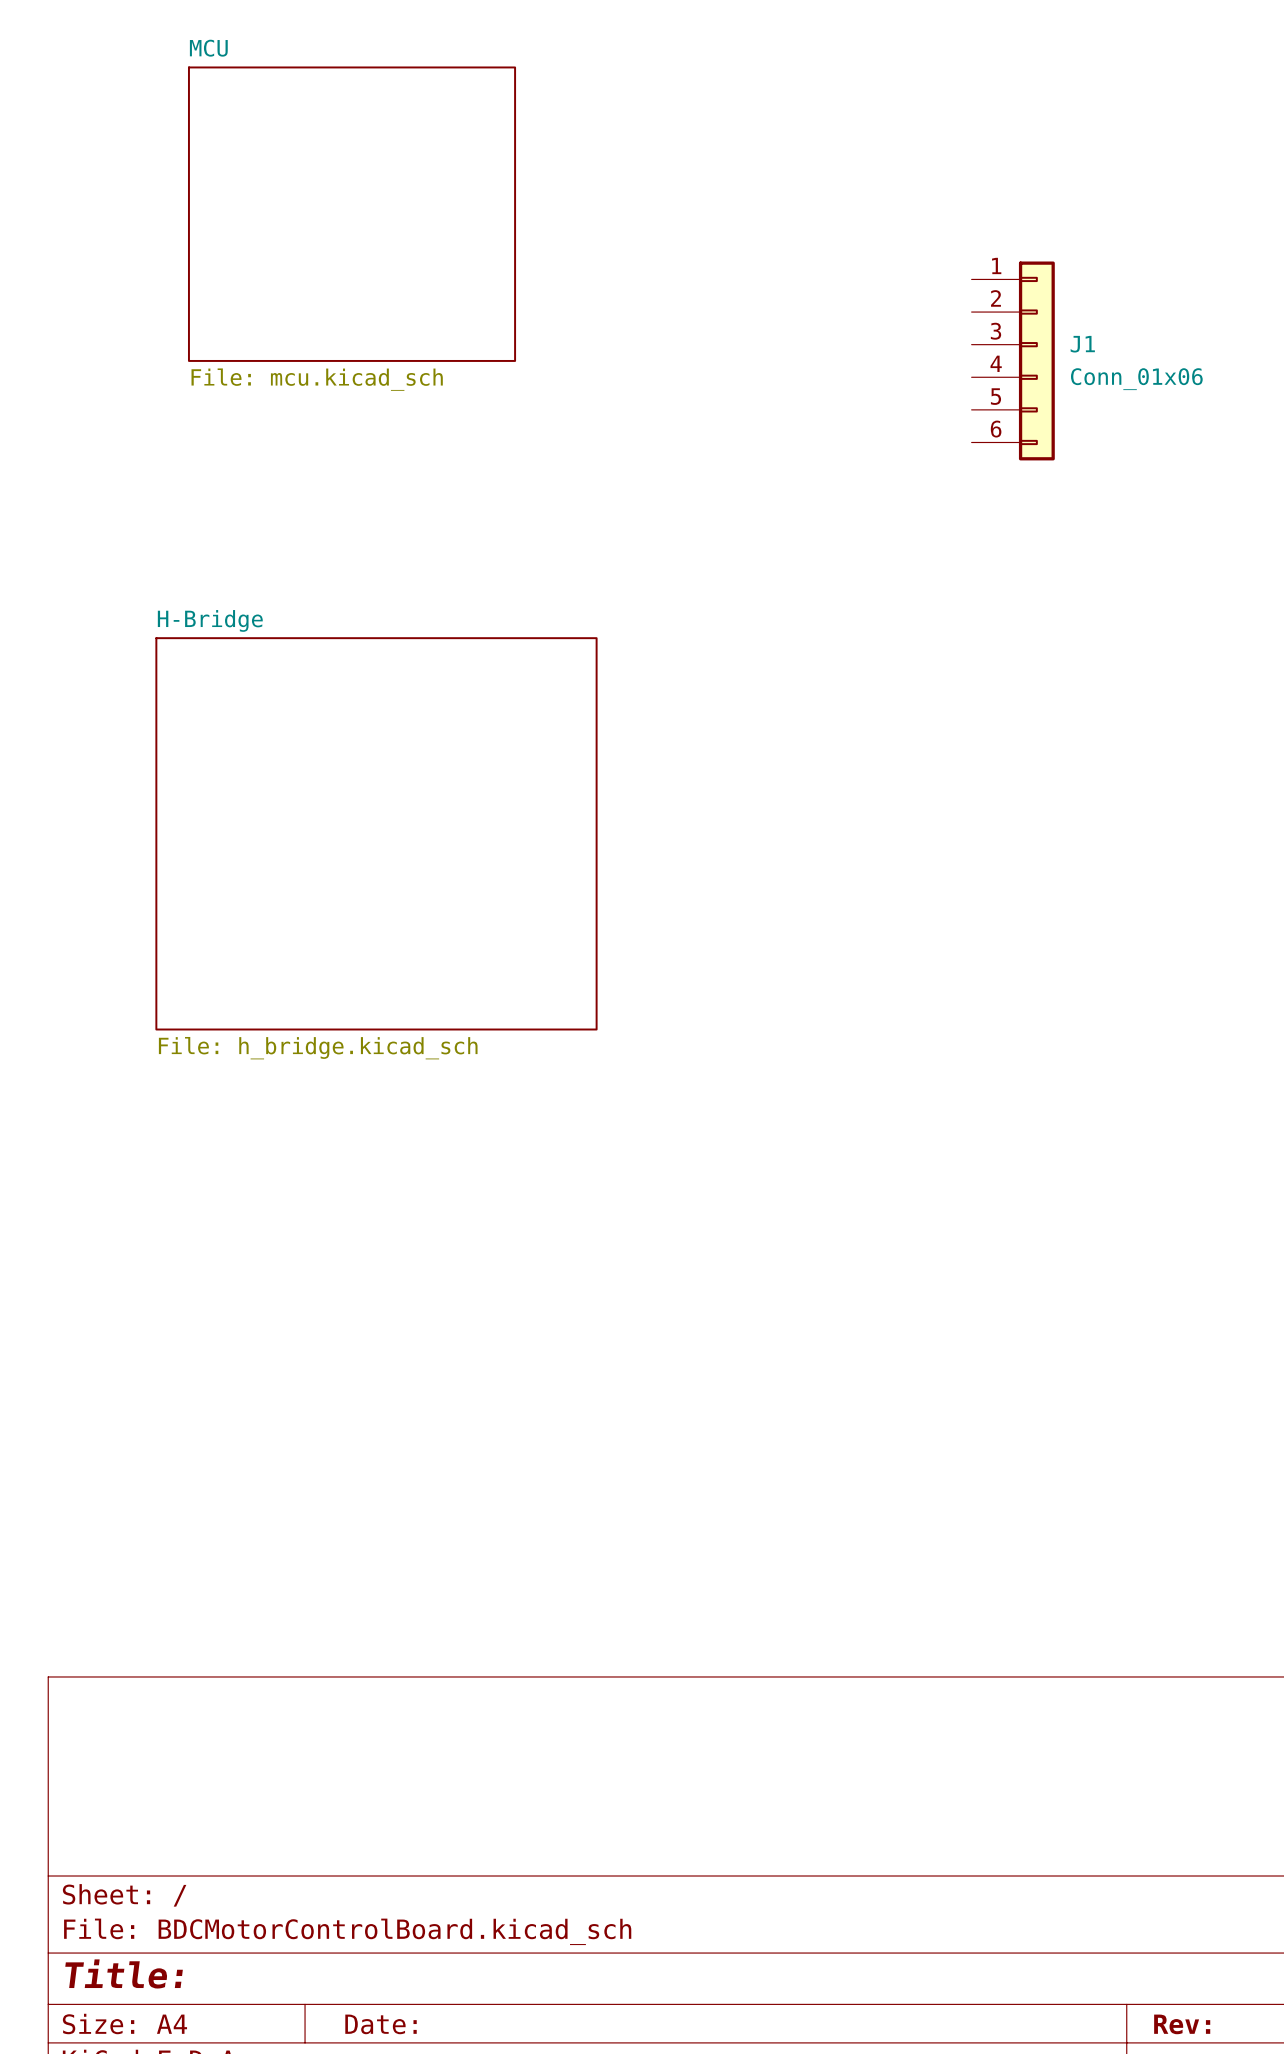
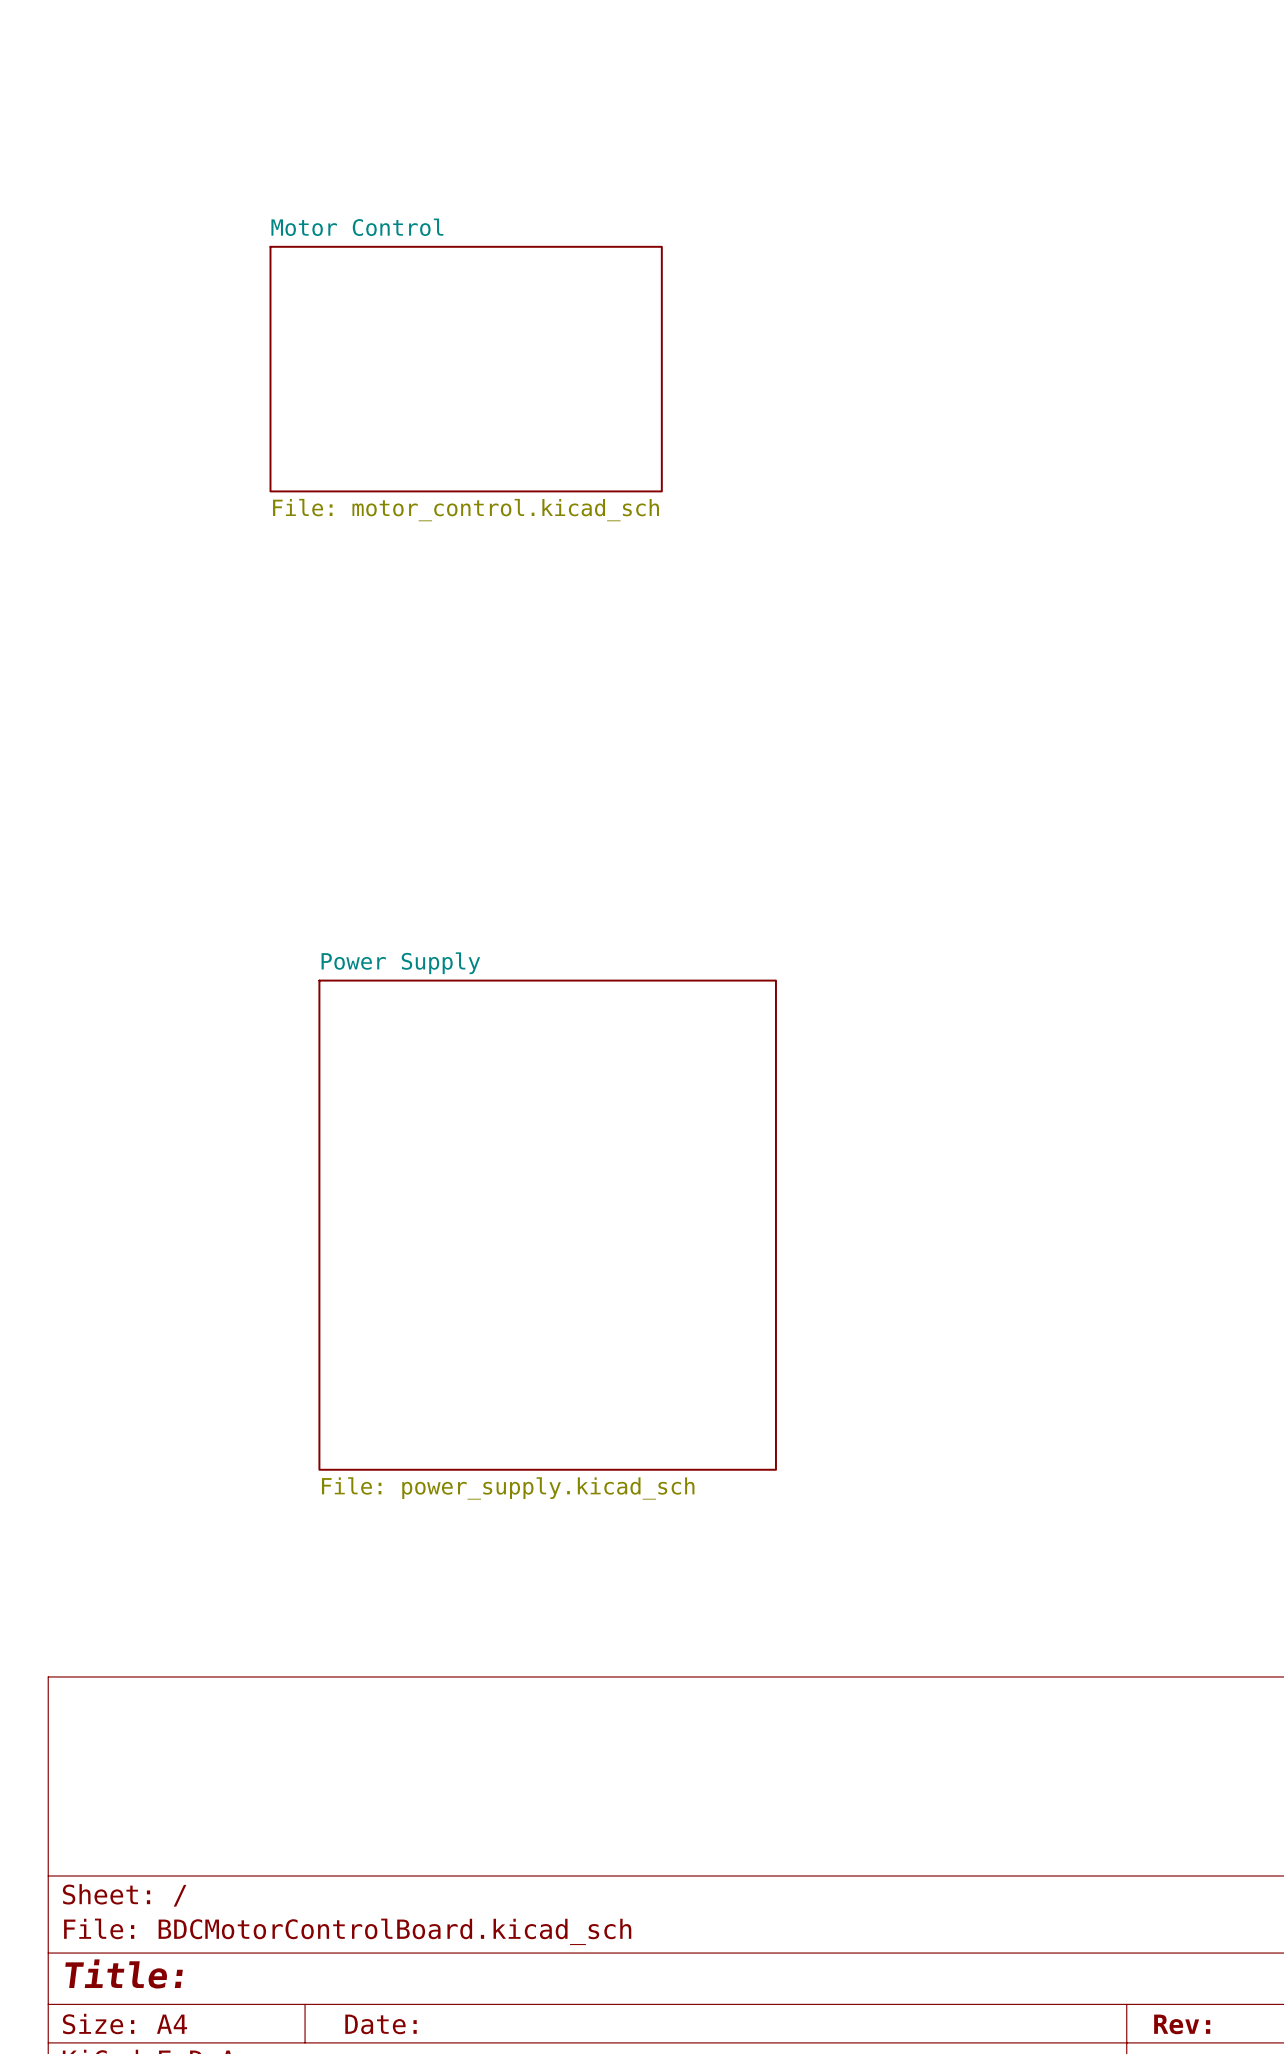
sheet MCU: File: mcu.kicad_sch (352, 214) -> none
J1: Conn_01x06 (1013, 360) -> none
sheet Motor Control: none -> File: motor_control.kicad_sch (466, 369)
sheet H-Bridge: File: h_bridge.kicad_sch (376, 833) -> none
sheet Power Supply: none -> File: power_supply.kicad_sch (547, 1225)

